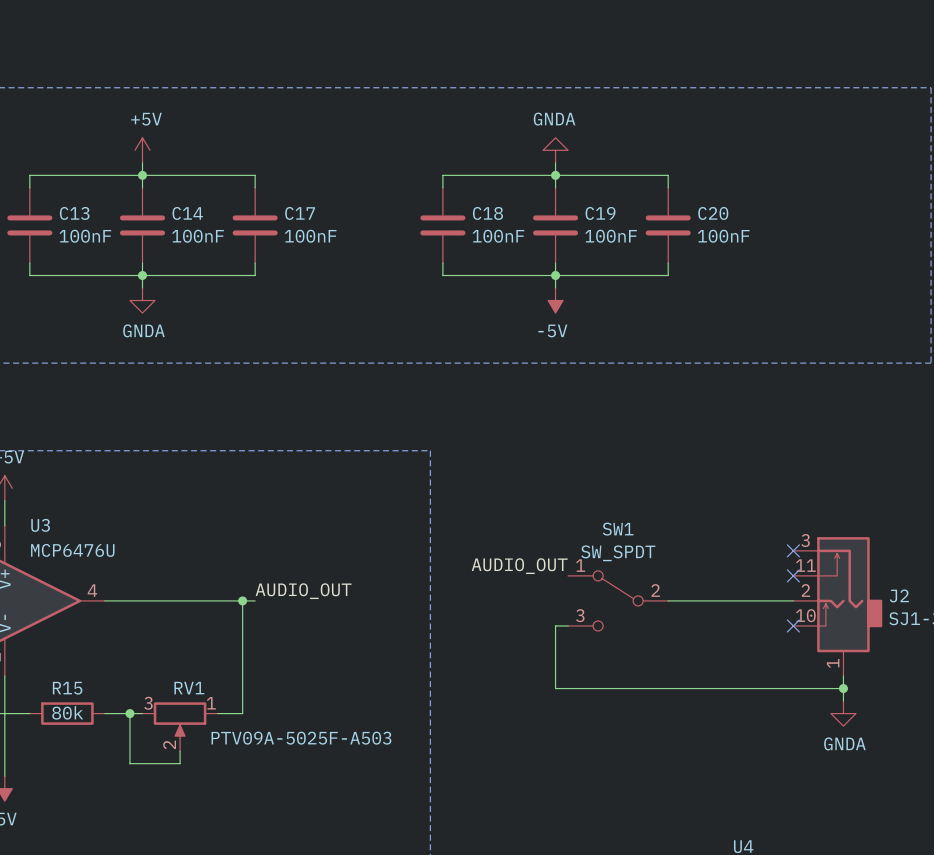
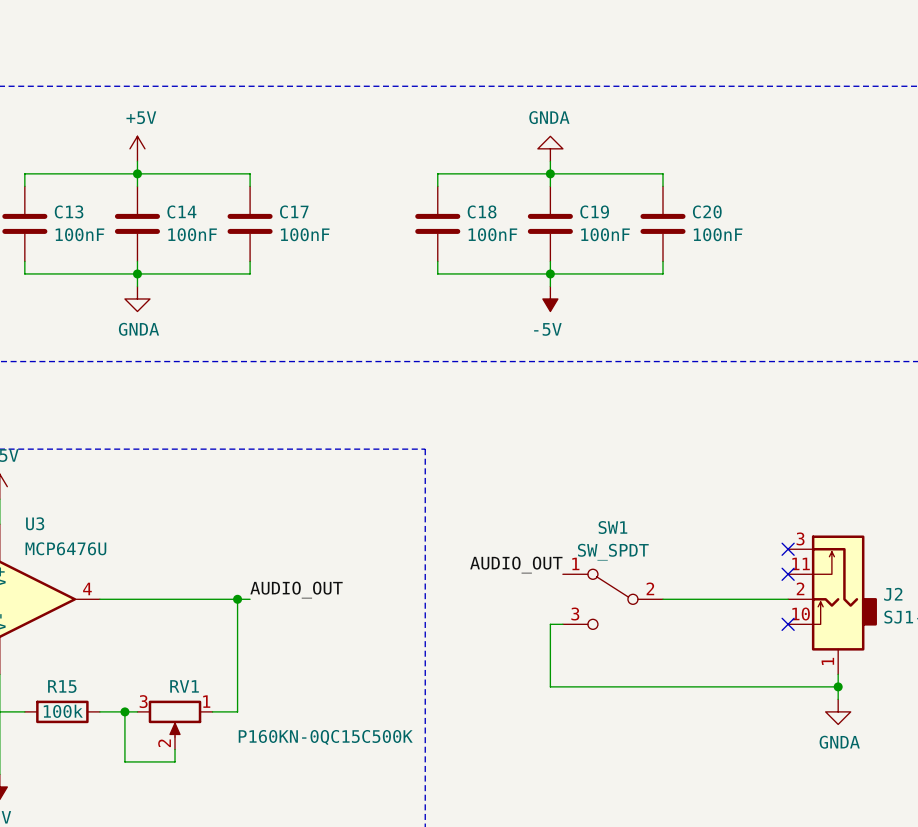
R15 value: 80k (67, 712) -> 100k (63, 711)
RV1 value: PTV09A-5025F-A503 (301, 738) -> P160KN-0QC15C500K (325, 737)

